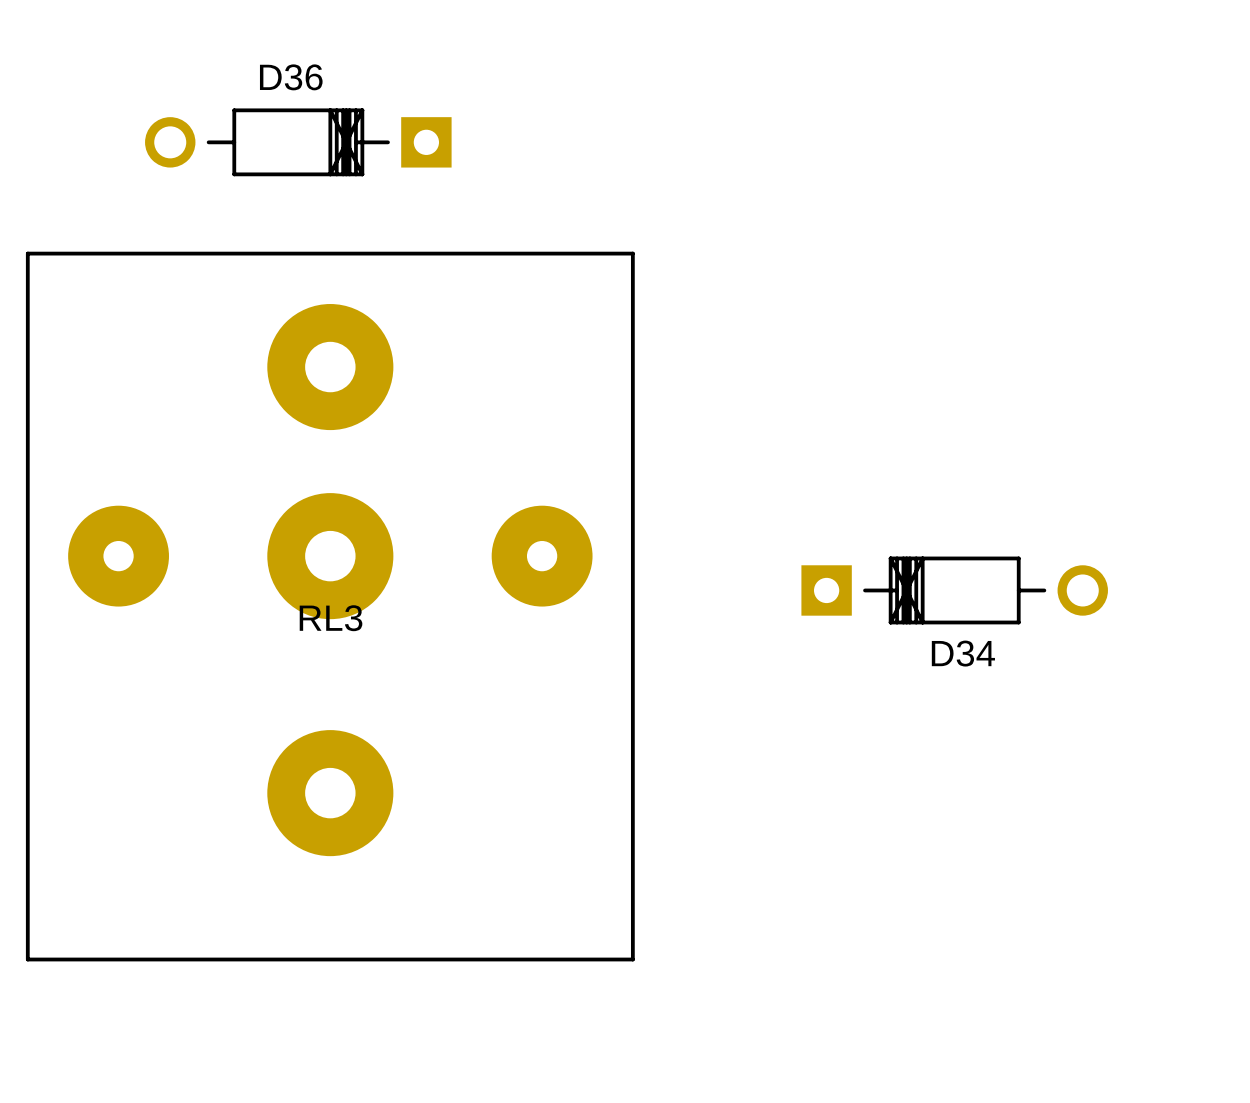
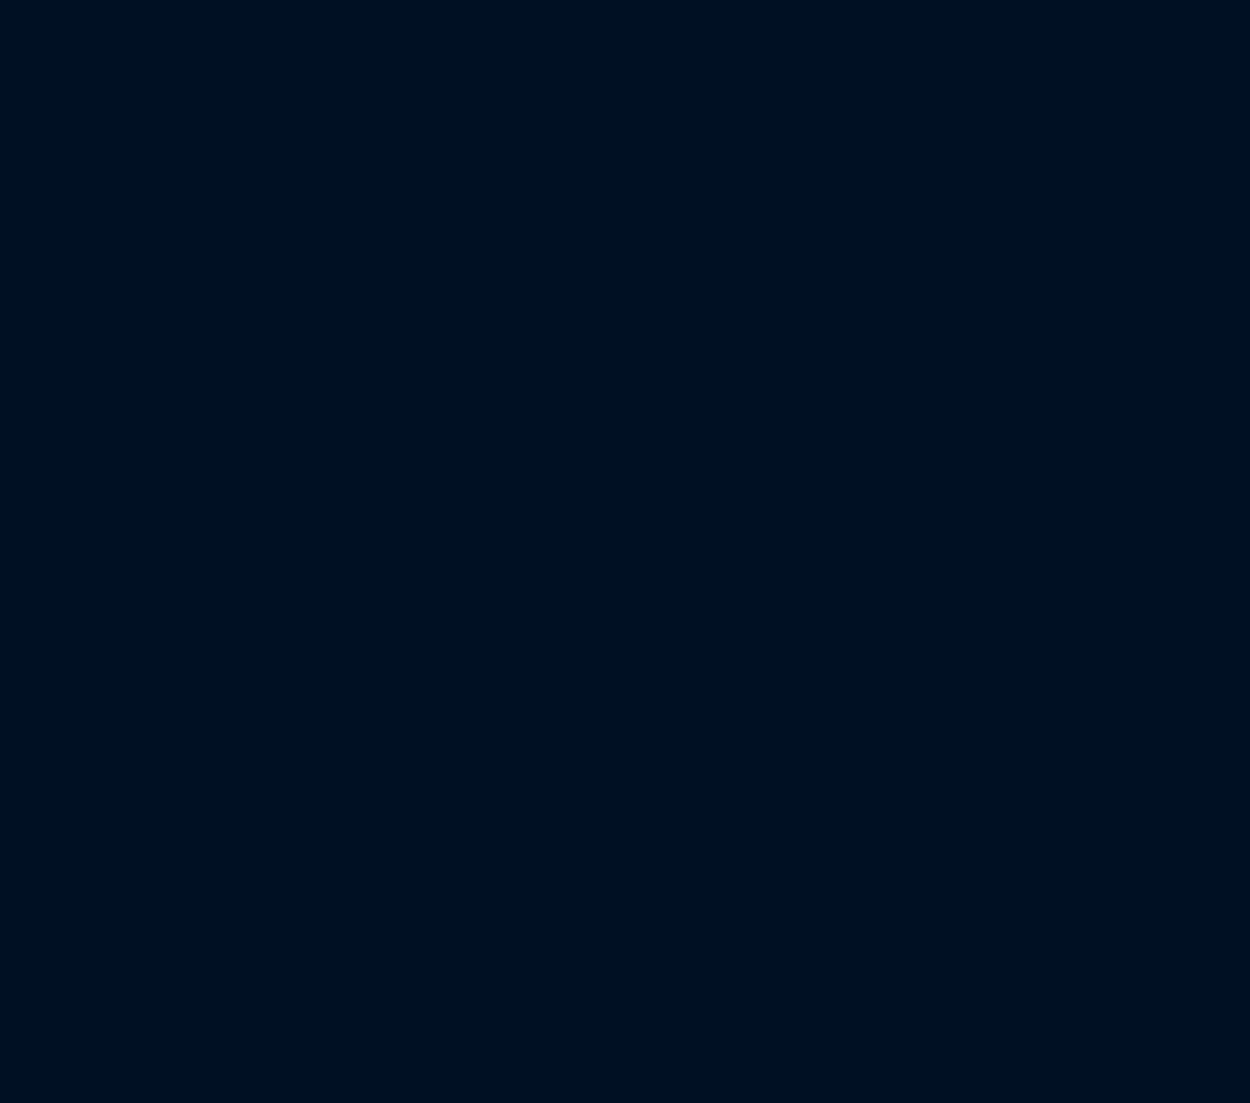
D36: (298, 142) -> none
D34: (954, 590) -> none
RL3: (330, 606) -> none

